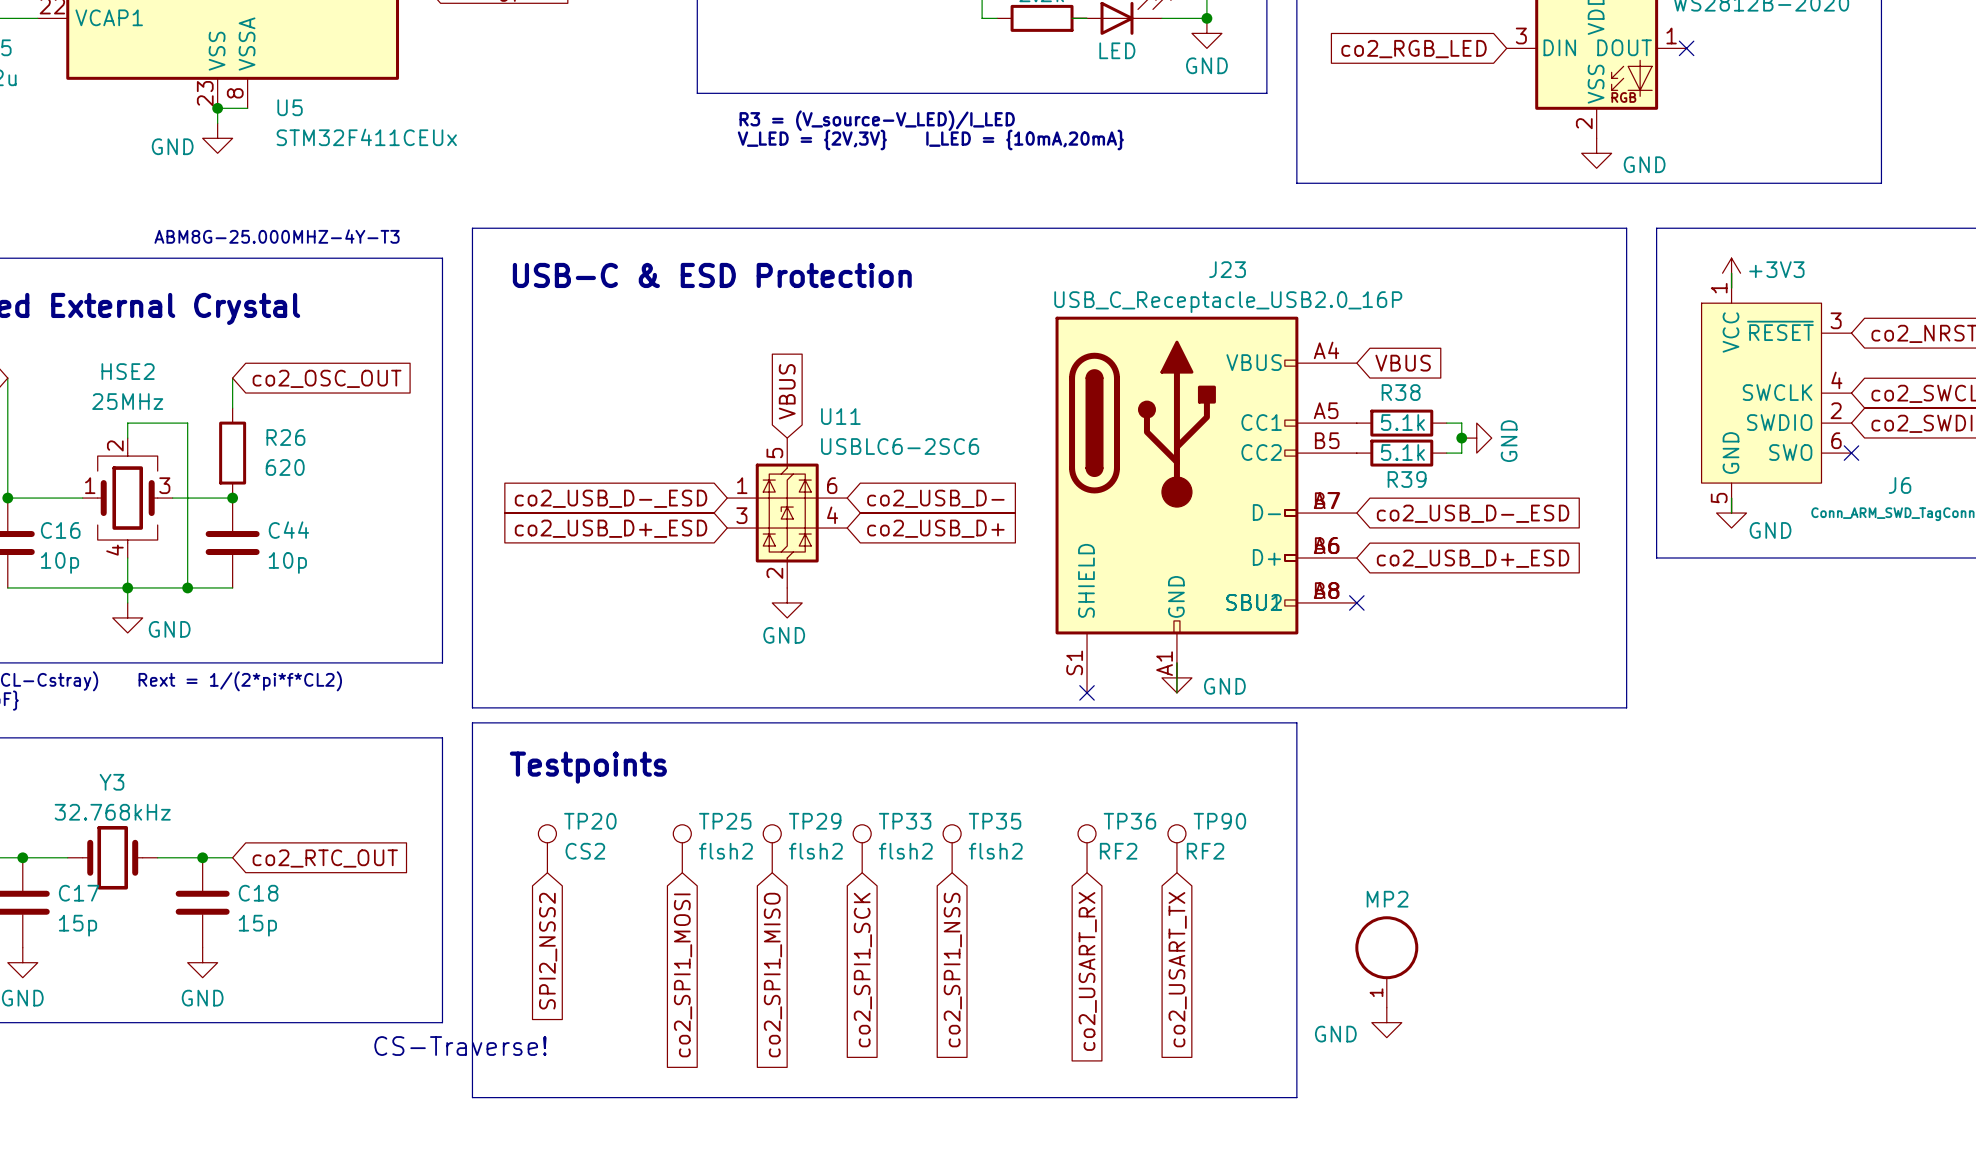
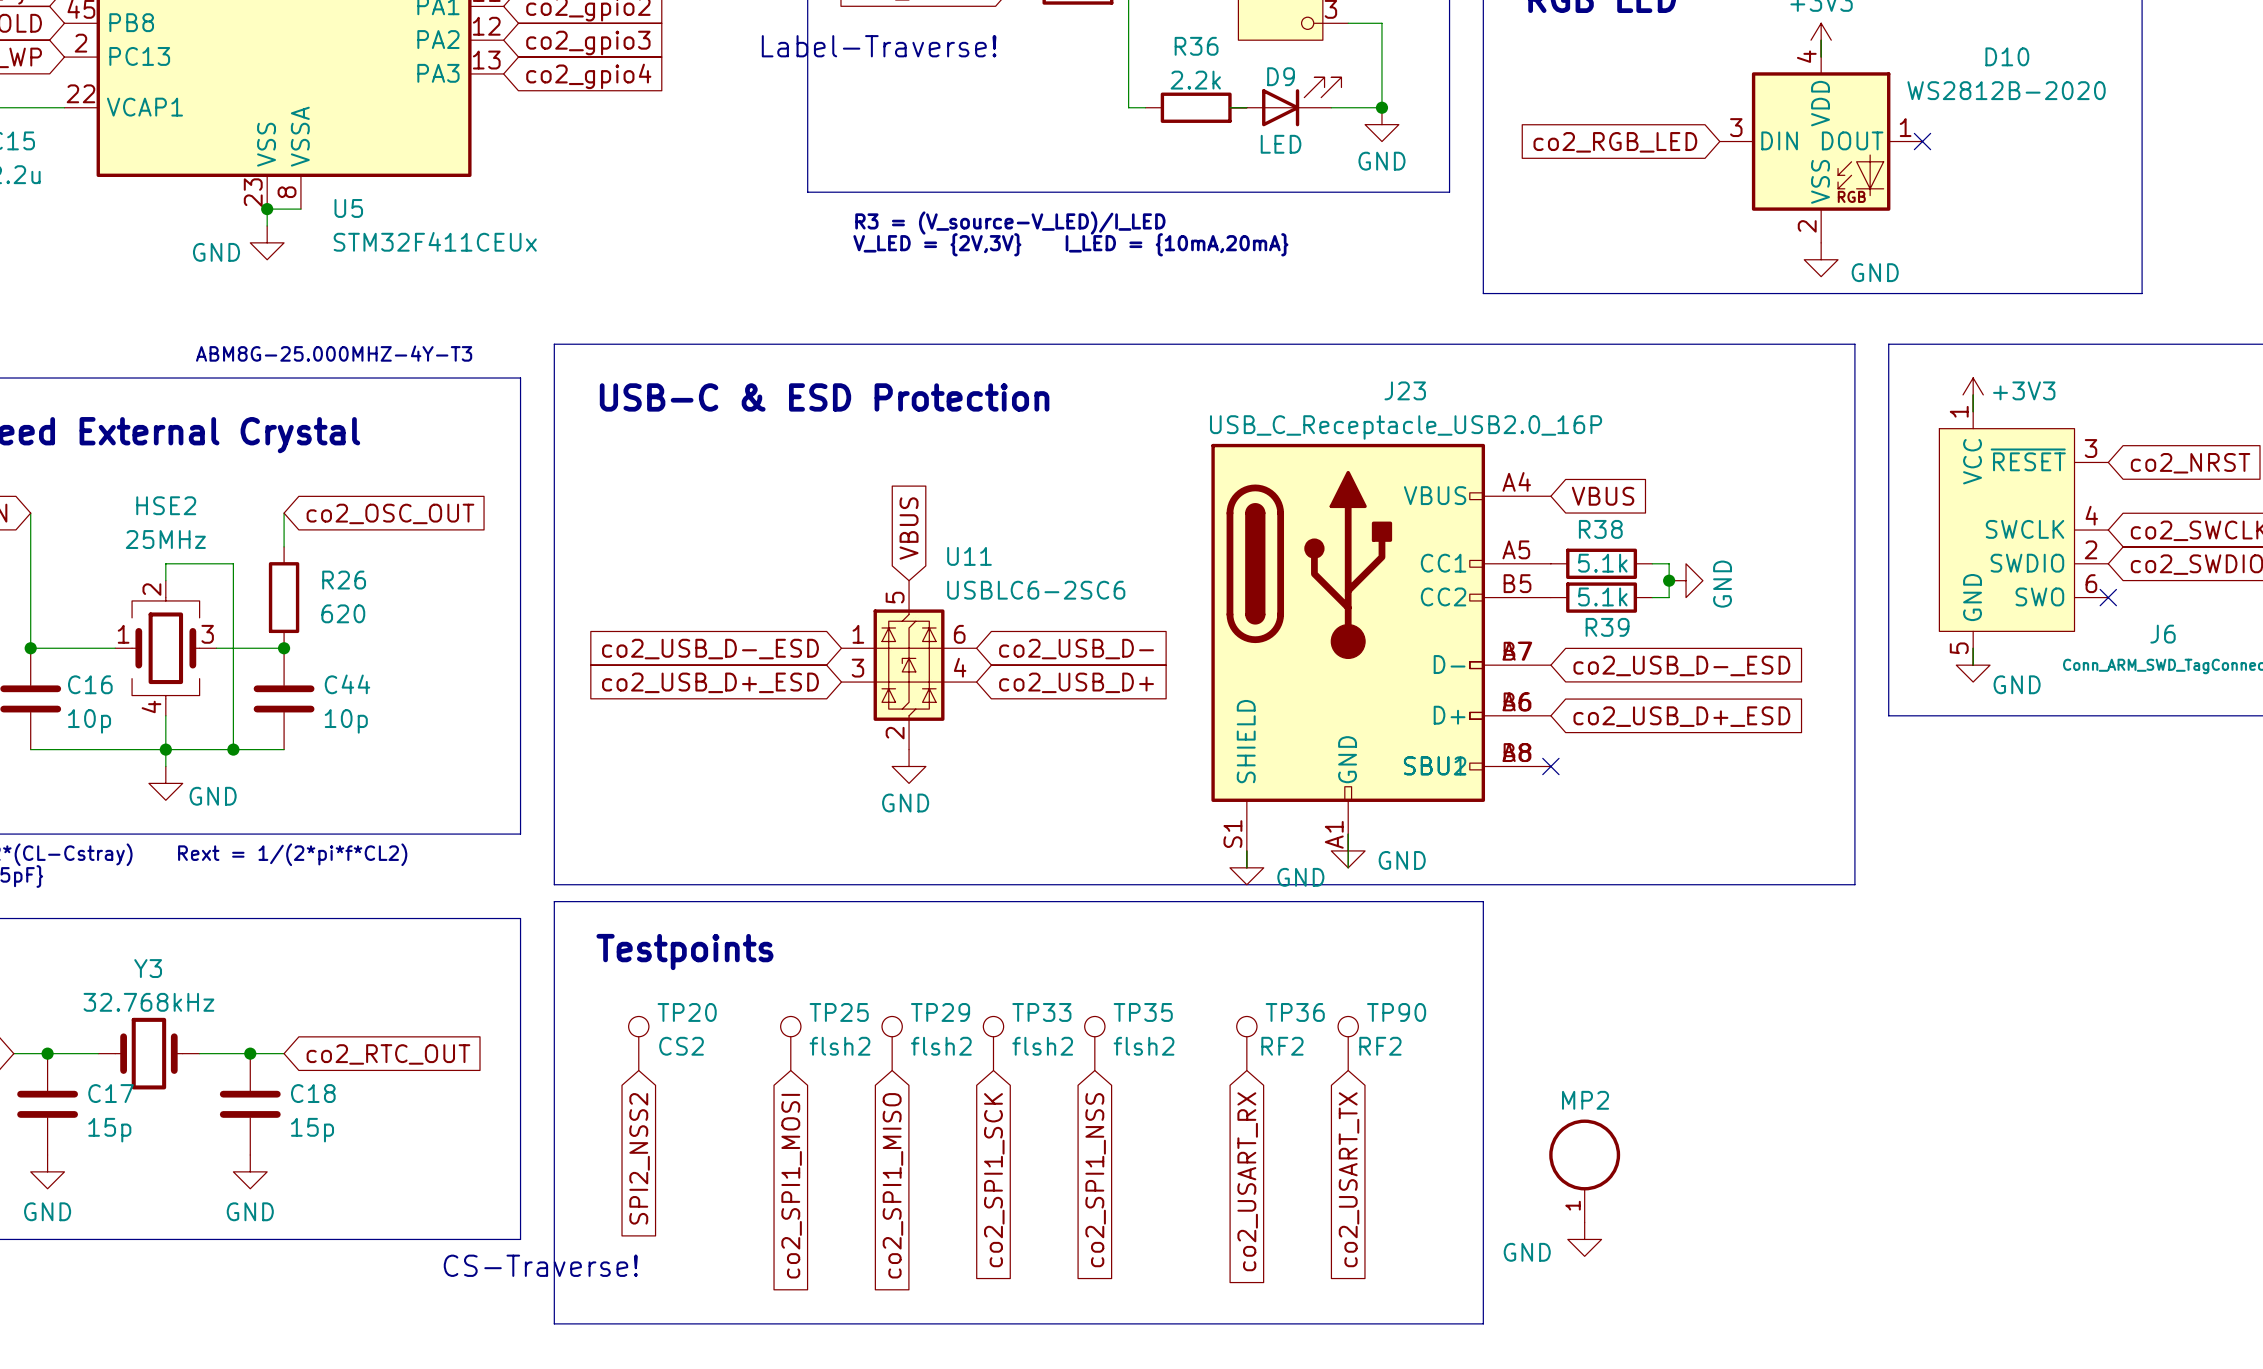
no-connect mark: (1087, 692) -> none
power symbol: none -> GND (1246, 867)

